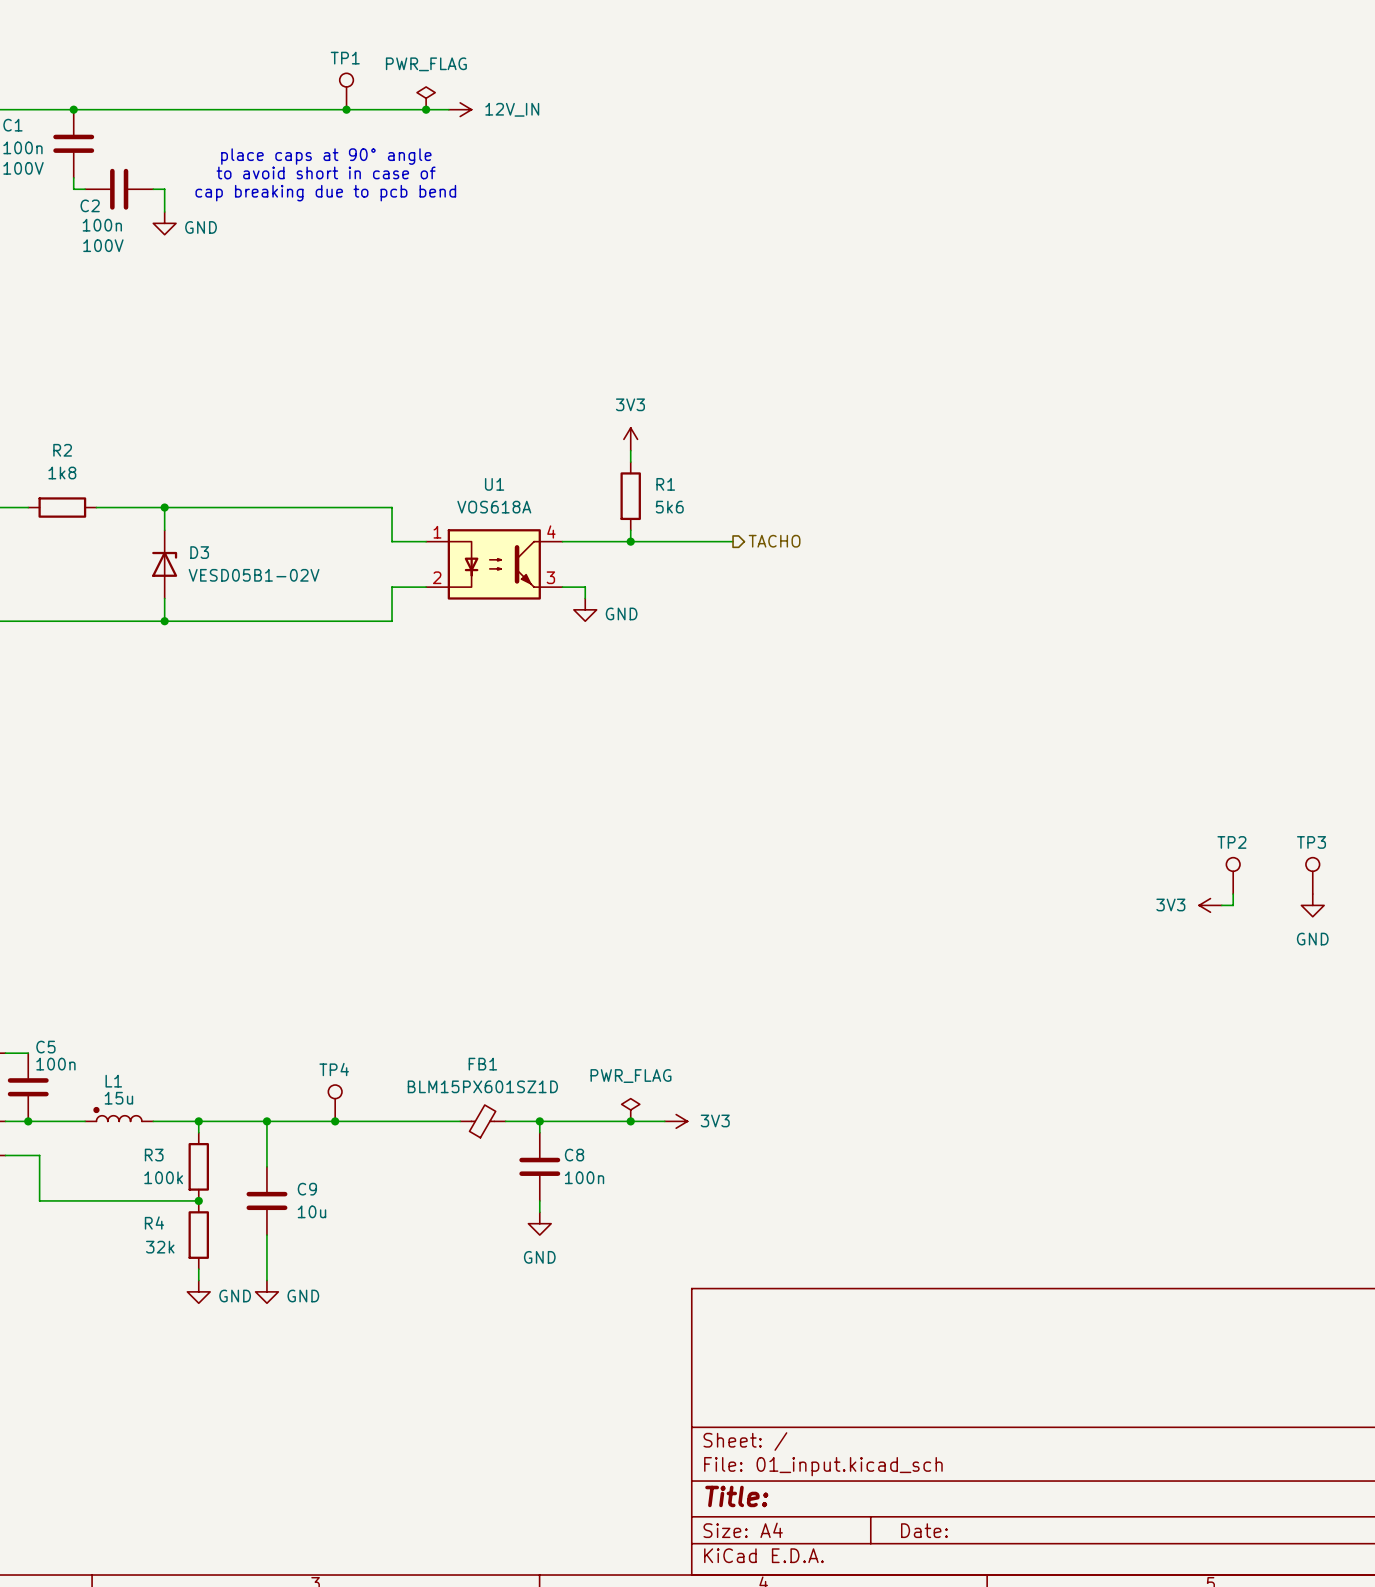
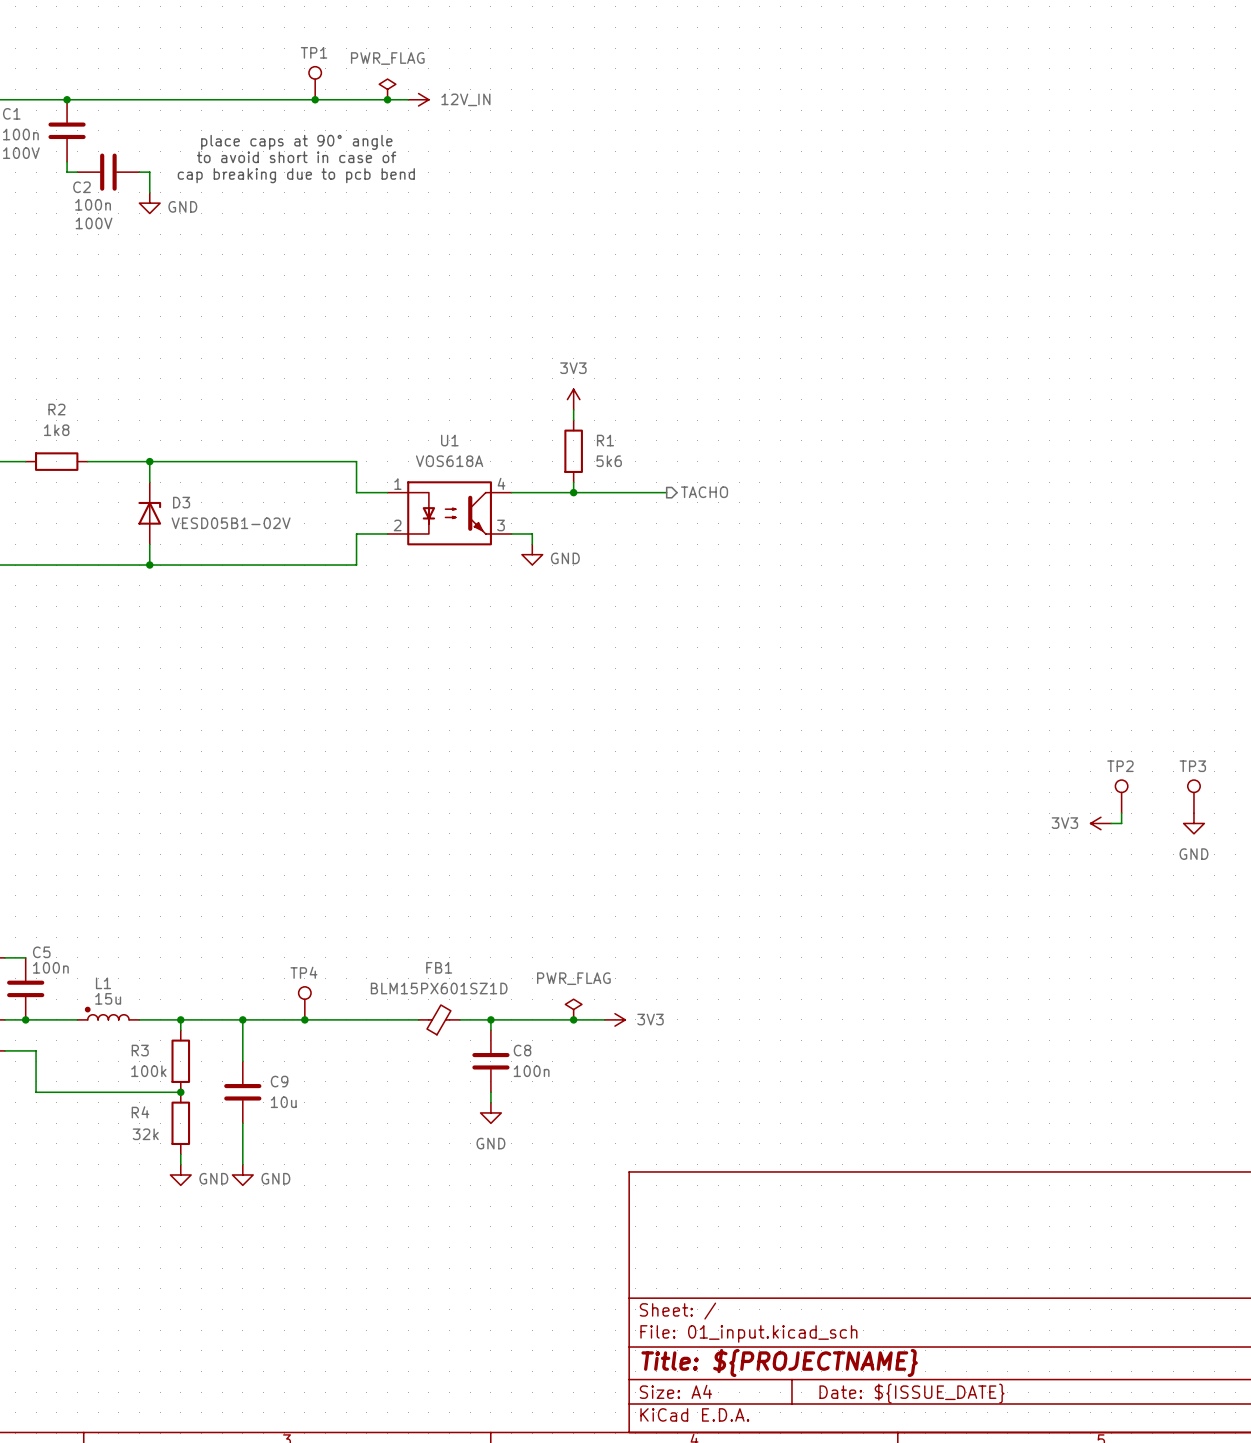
title block: Title: (736, 1496) -> Title: ${PROJECTNAME} (779, 1362)
title block: Date: (924, 1530) -> Date: ${ISSUE_DATE} (912, 1393)

